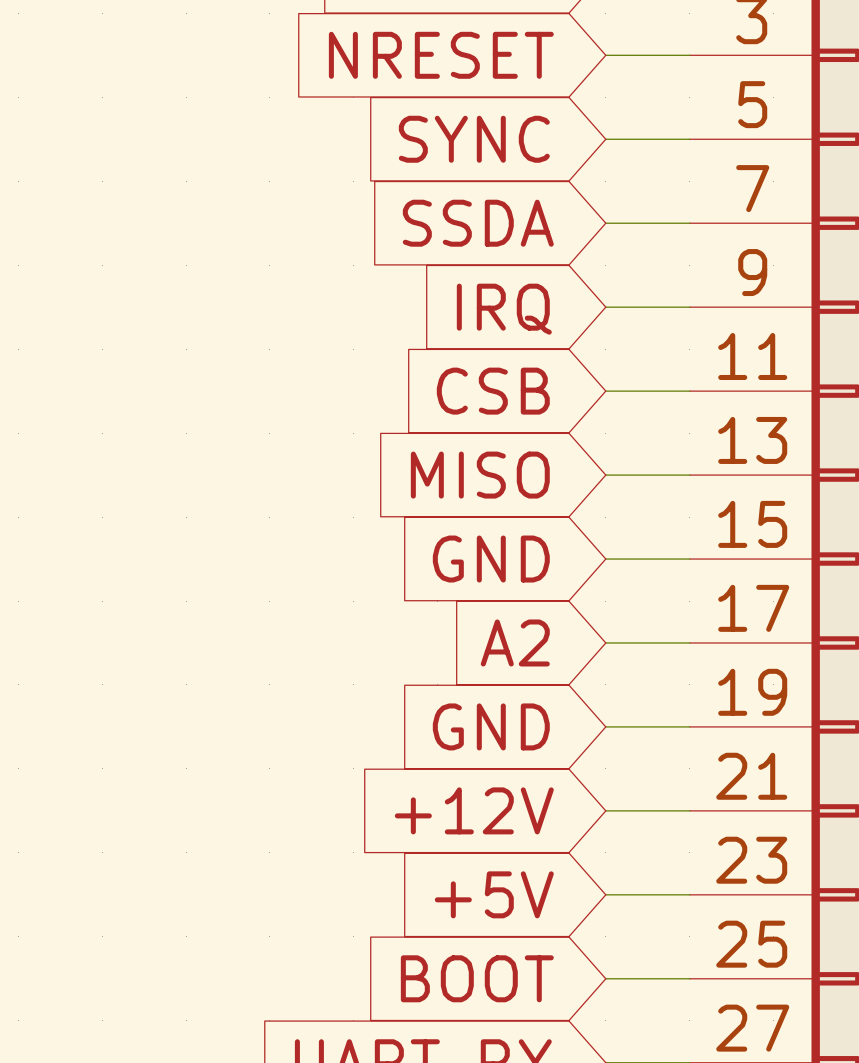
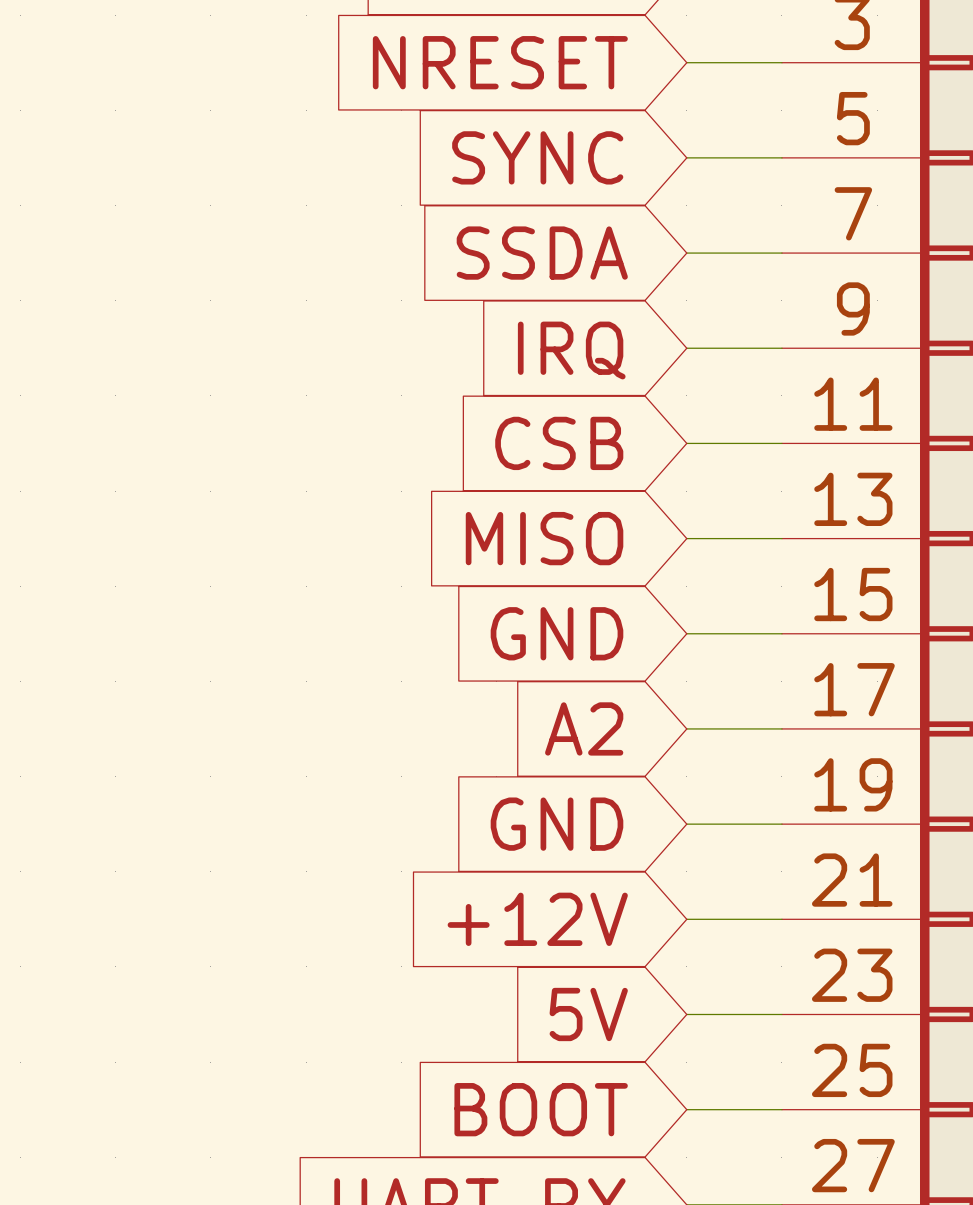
global label: +5V (494, 894) -> 5V (588, 1014)

